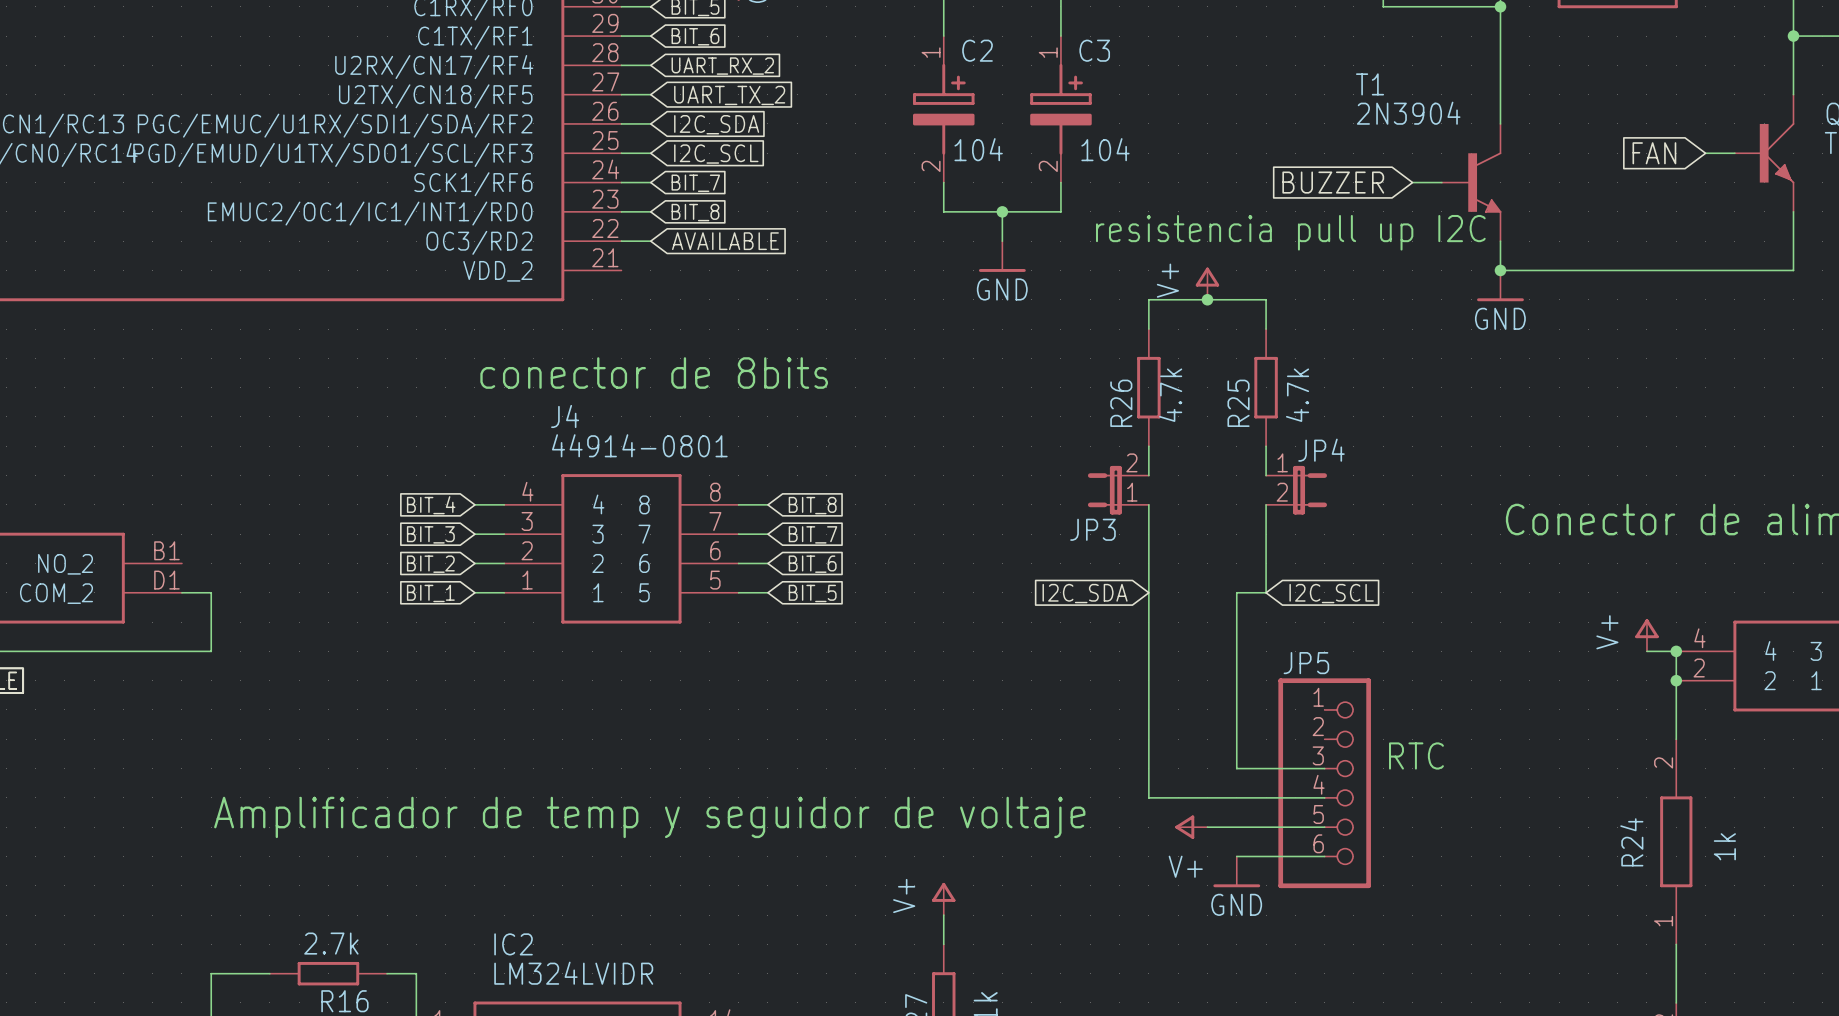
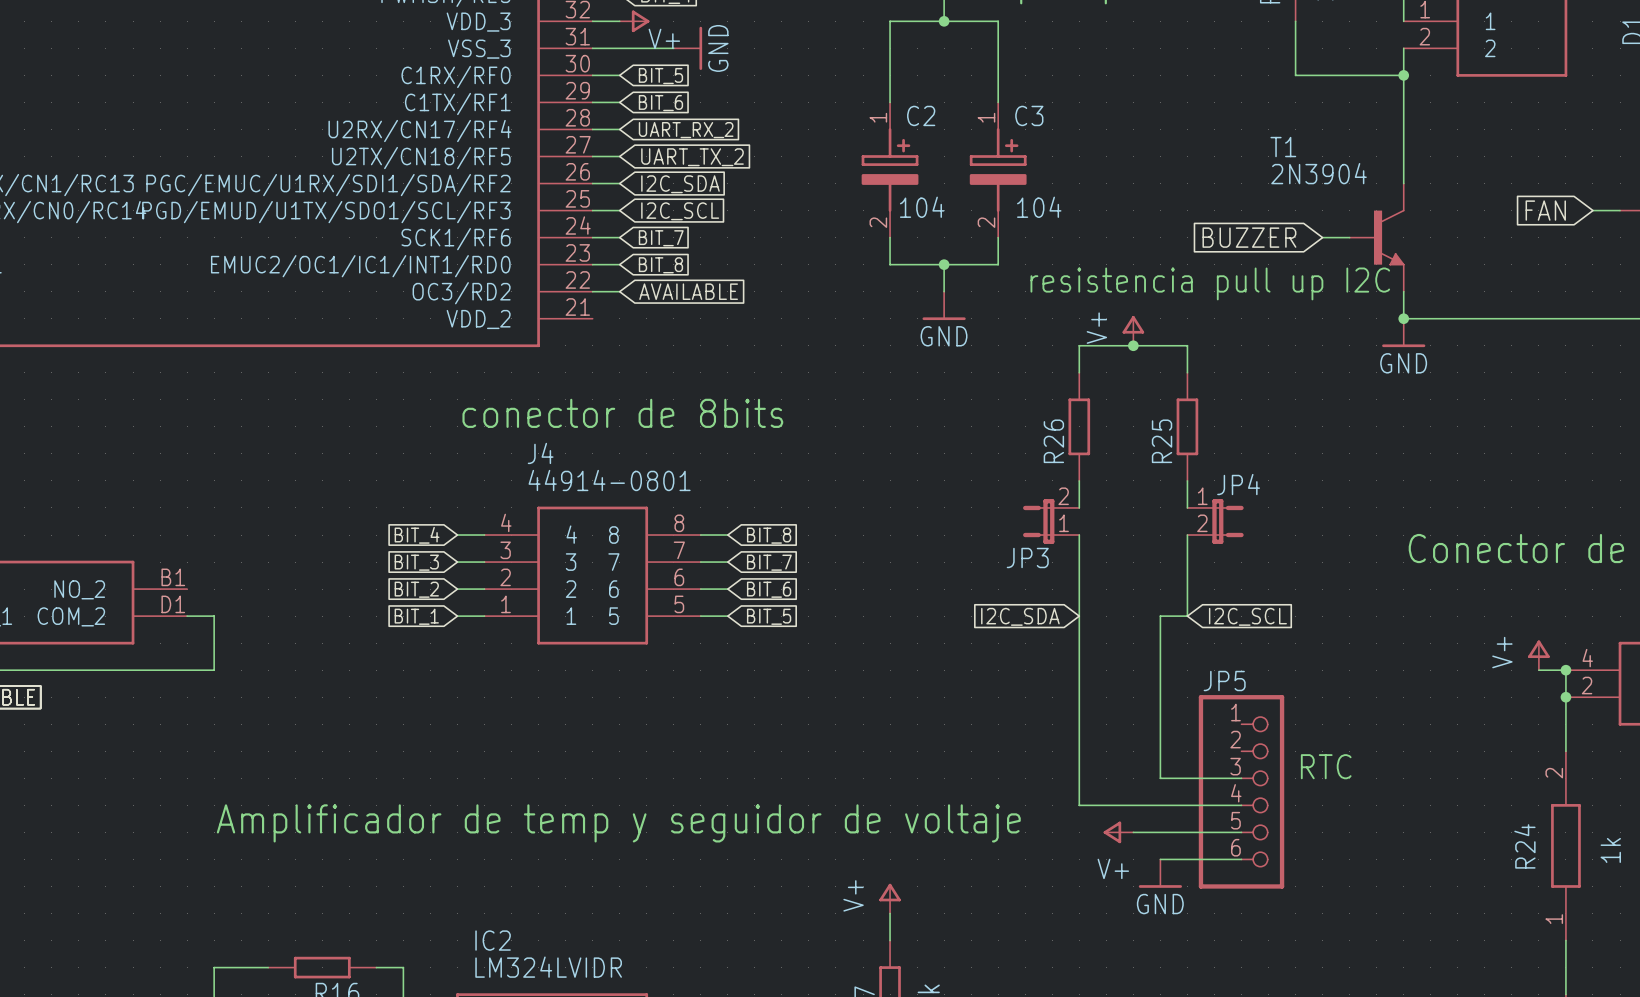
text: 4.7k (1170, 395) -> none
text: 4.7k (1297, 395) -> none
text: 2.7k (331, 943) -> none

